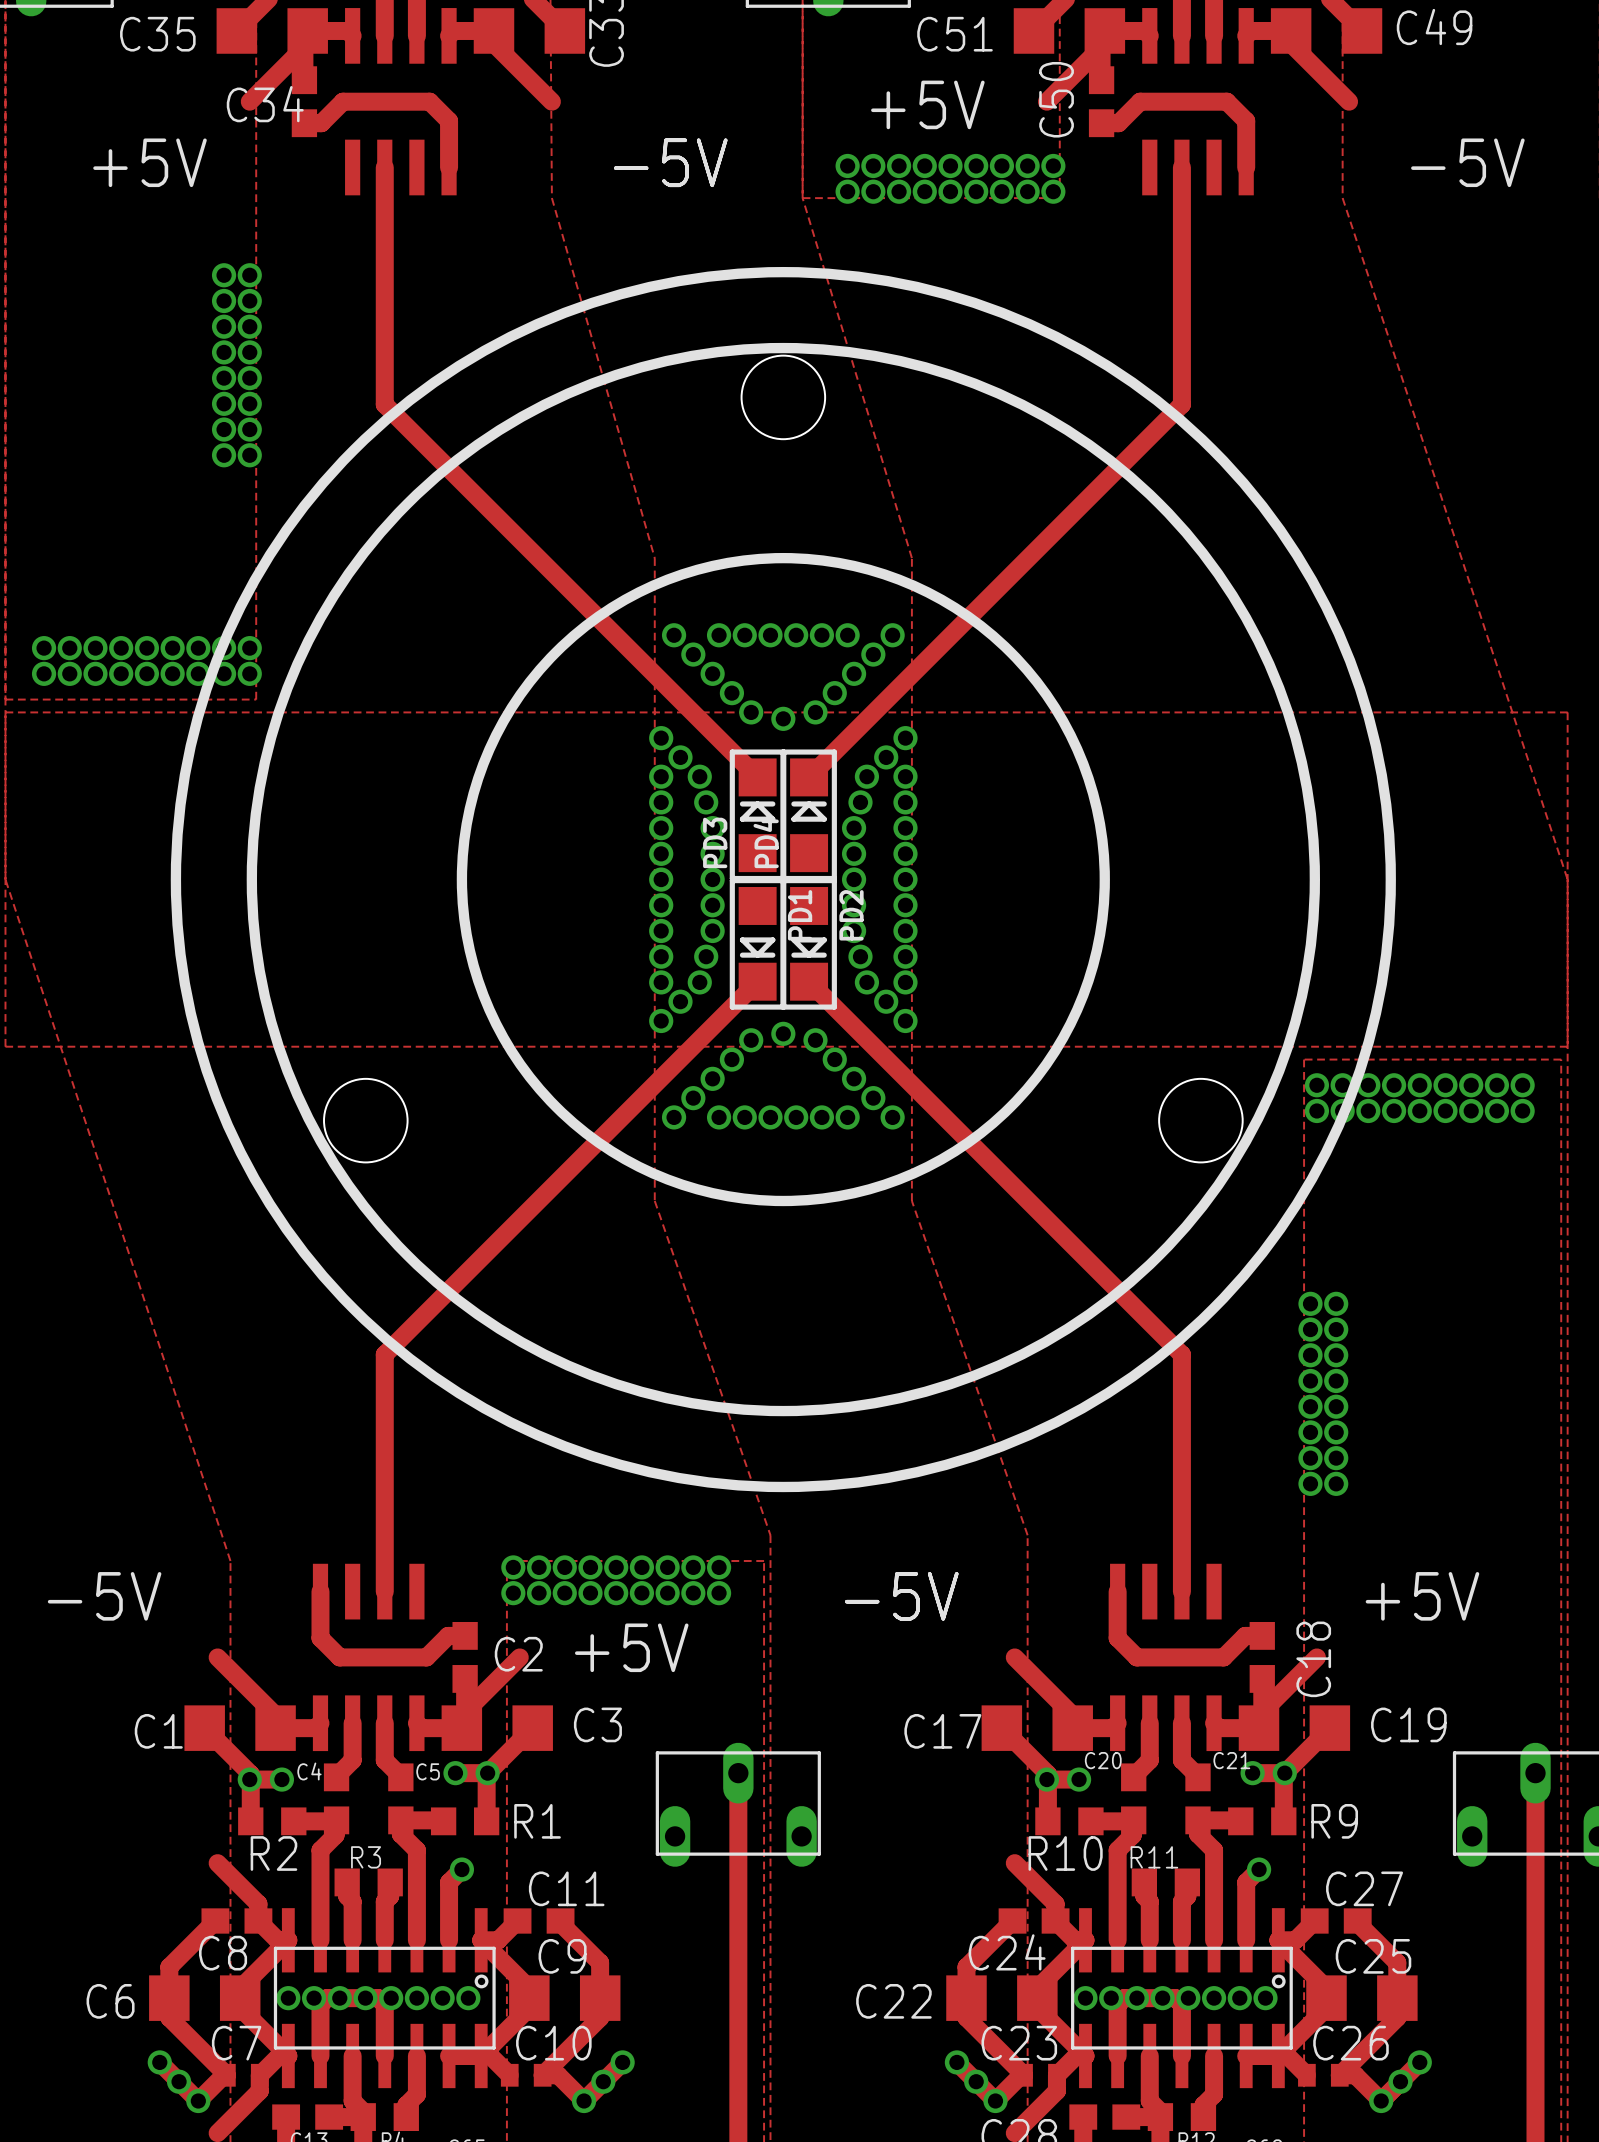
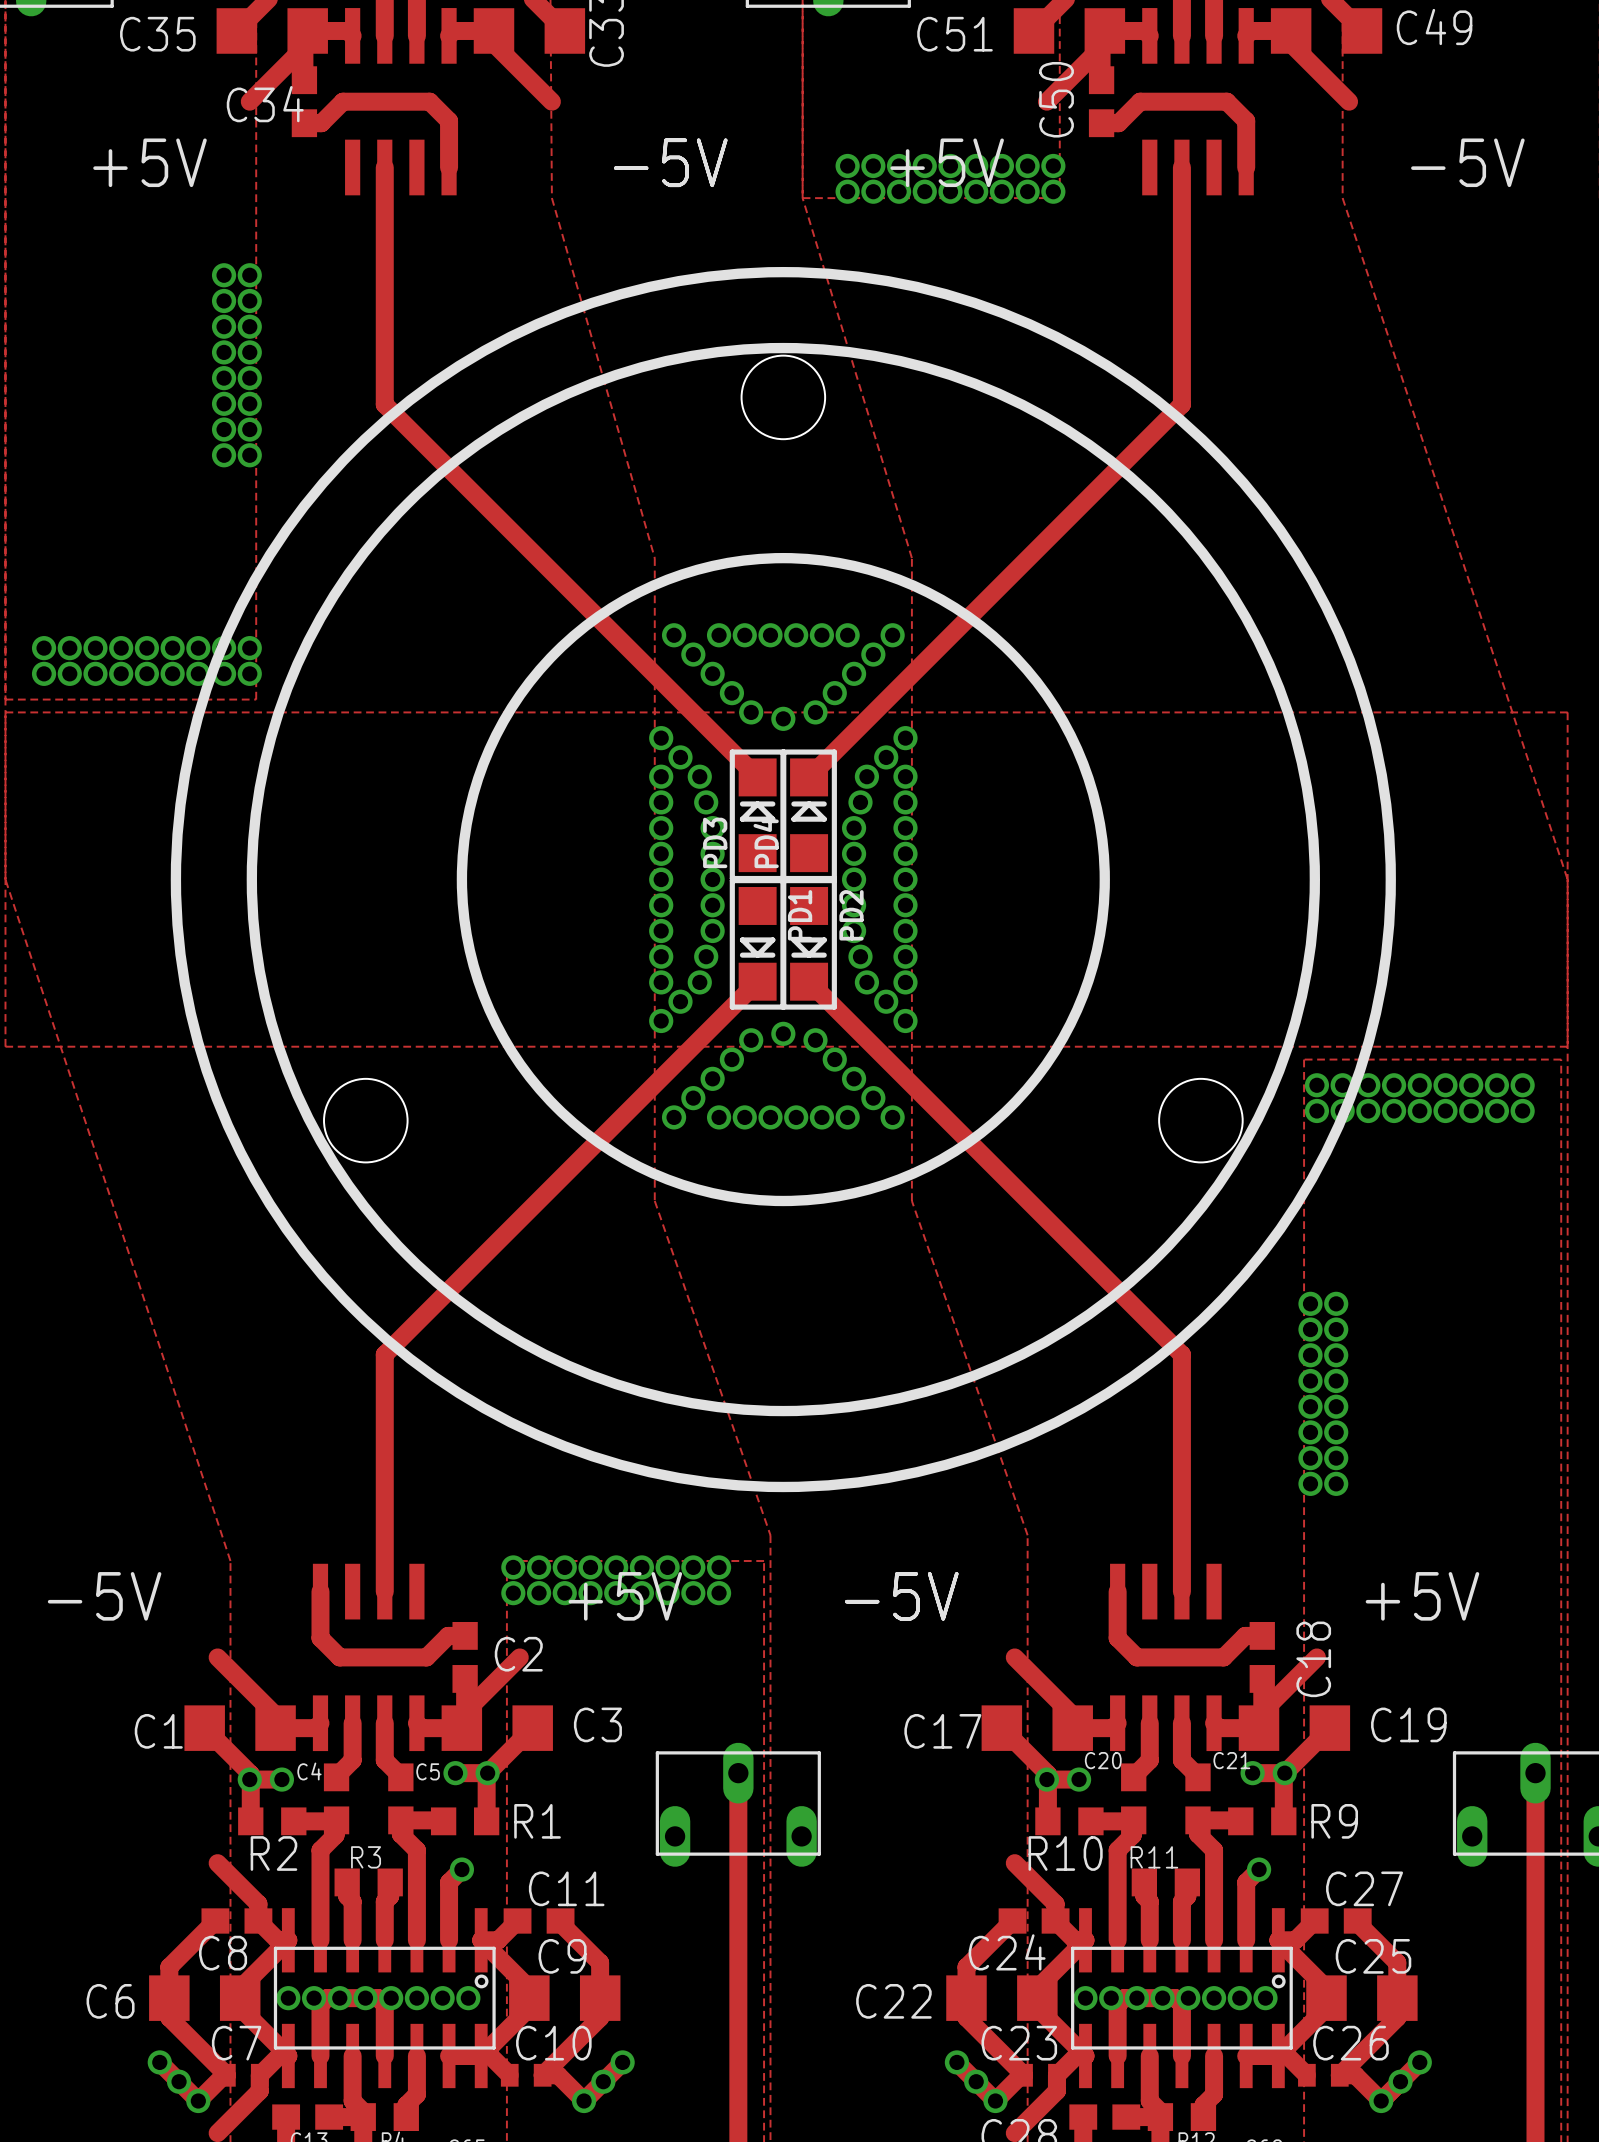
text position: +5V (927, 104) -> +5V (947, 162)
text position: +5V (631, 1647) -> +5V (625, 1596)

